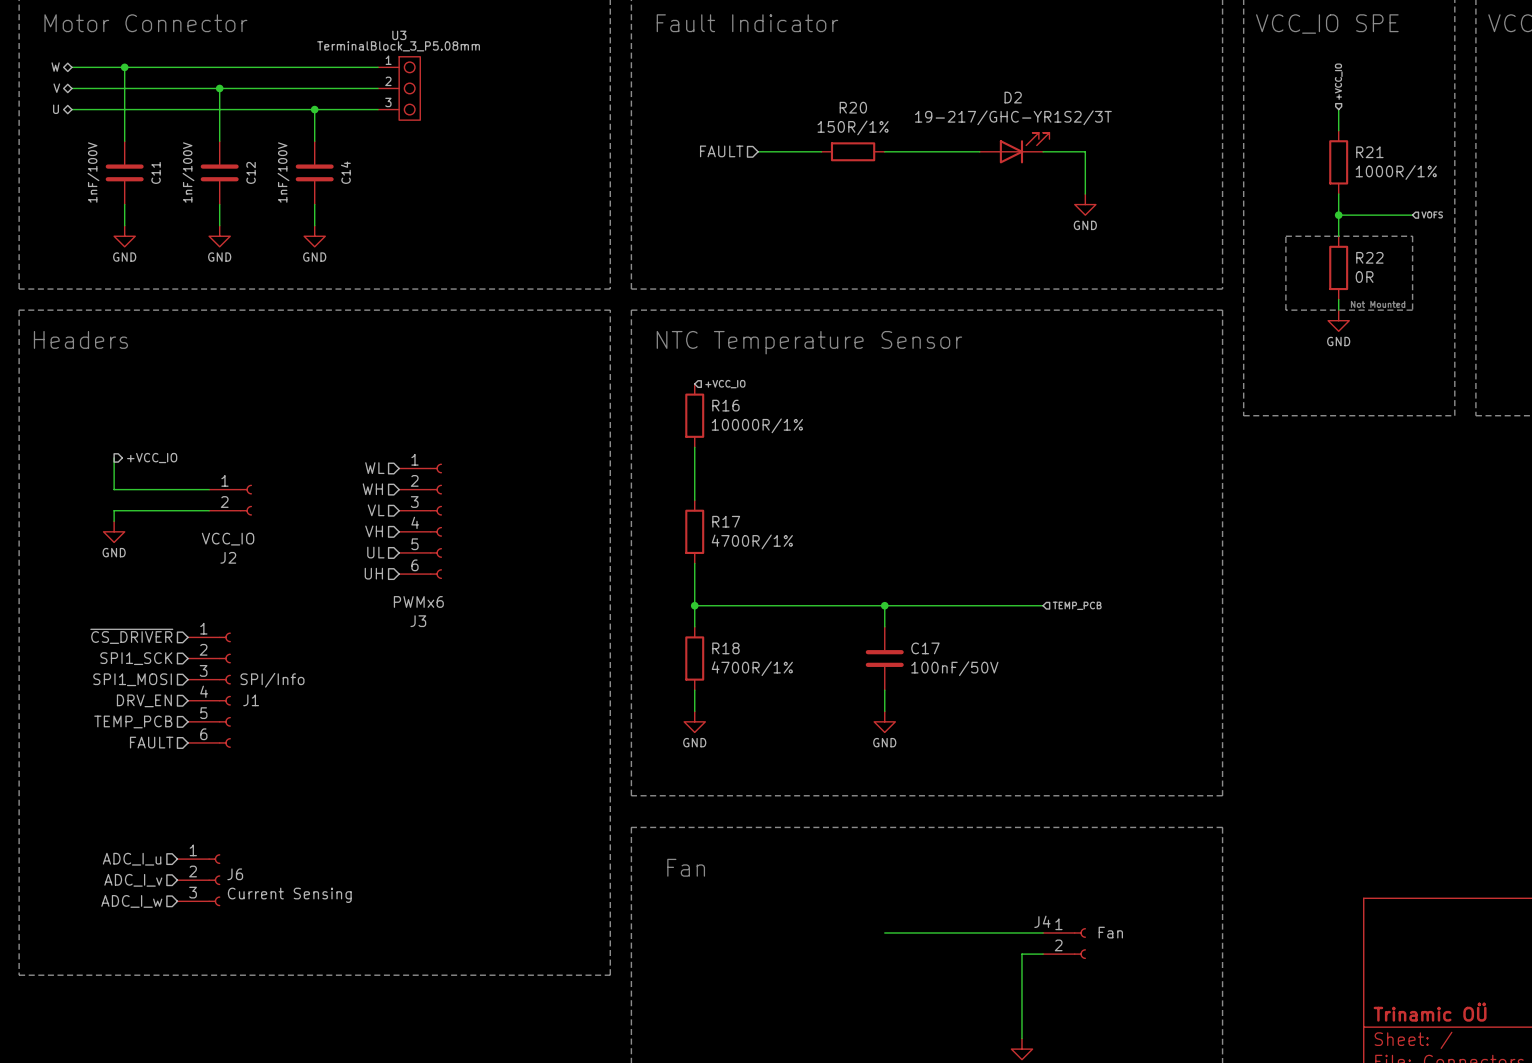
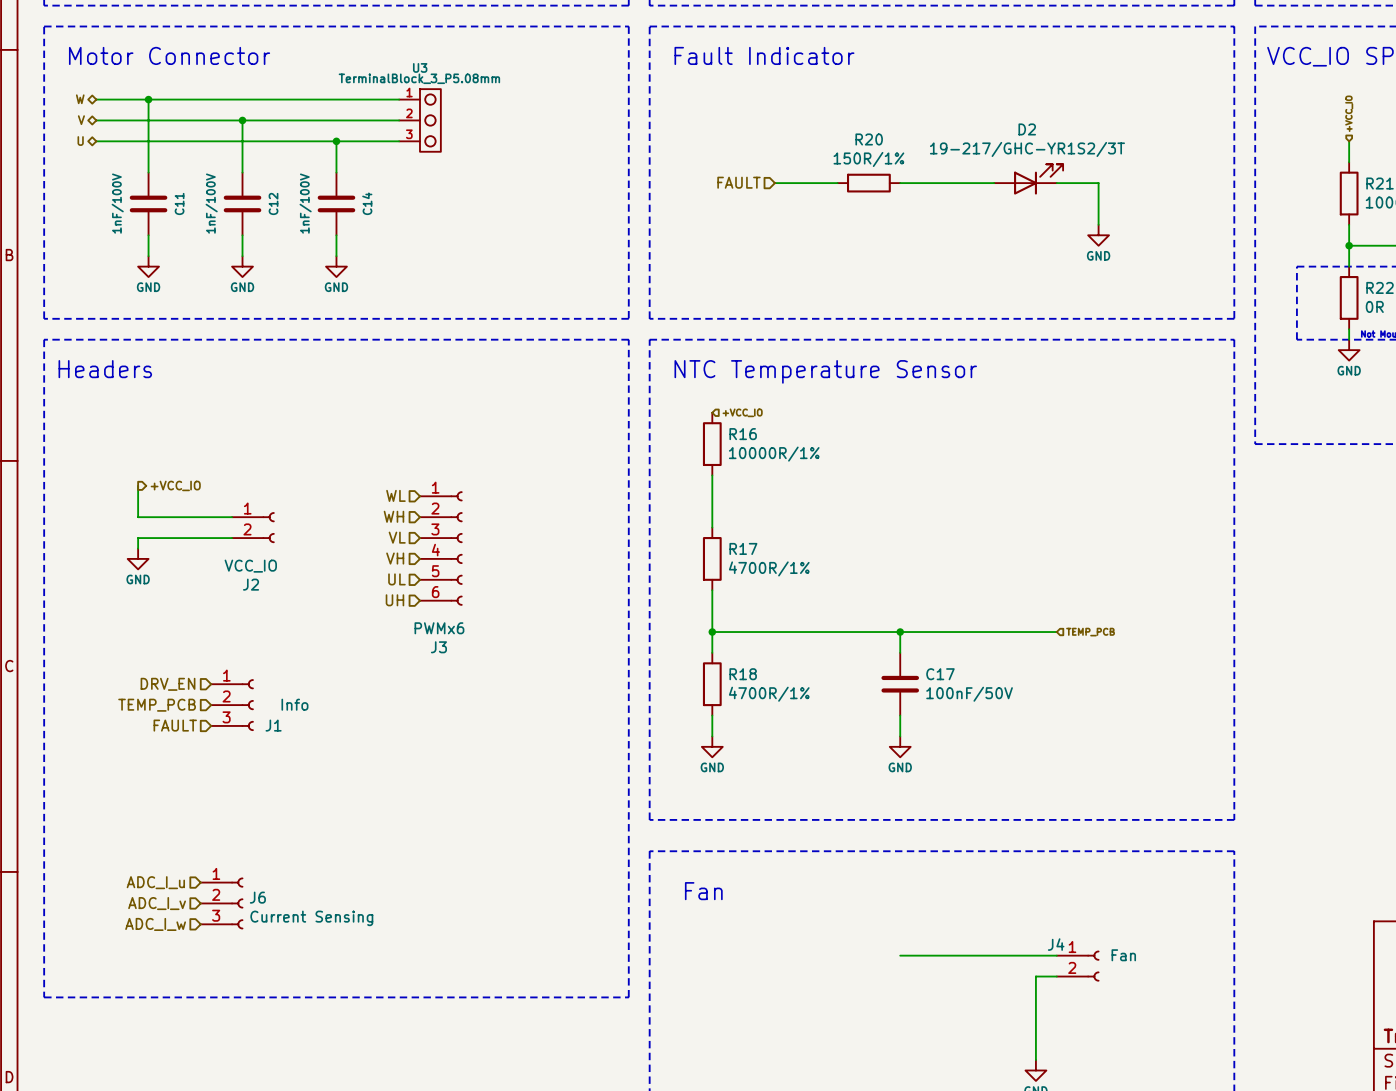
J1 symbol: [188, 632, 231, 748] -> [211, 679, 254, 731]
hierarchical label: ~{CS_DRIVER} (131, 636) -> none
hierarchical label: SPI1_SCK (136, 658) -> DRV_EN (168, 684)
hierarchical label: SPI1_MOSI (132, 679) -> TEMP_PCB (157, 705)
J1 value: SPI/Info (272, 680) -> Info (294, 704)
hierarchical label: DRV_EN (144, 700) -> FAULT (175, 725)
hierarchical label: TEMP_PCB (133, 721) -> none
hierarchical label: FAULT (151, 742) -> none

